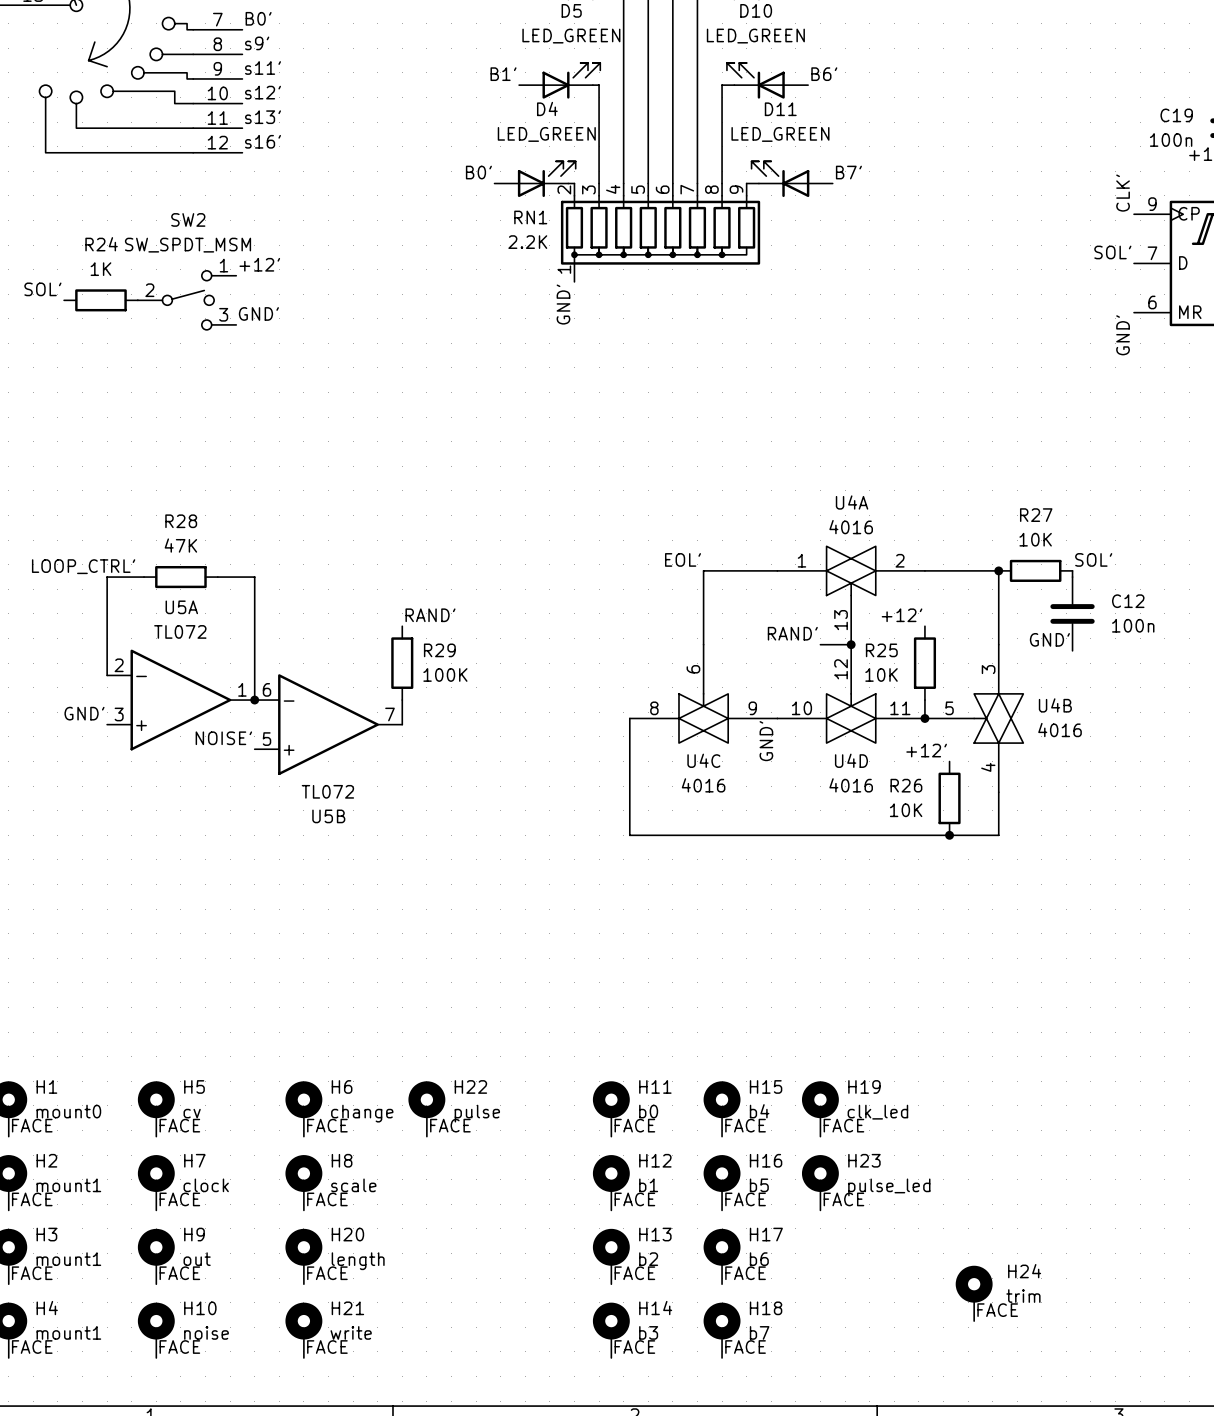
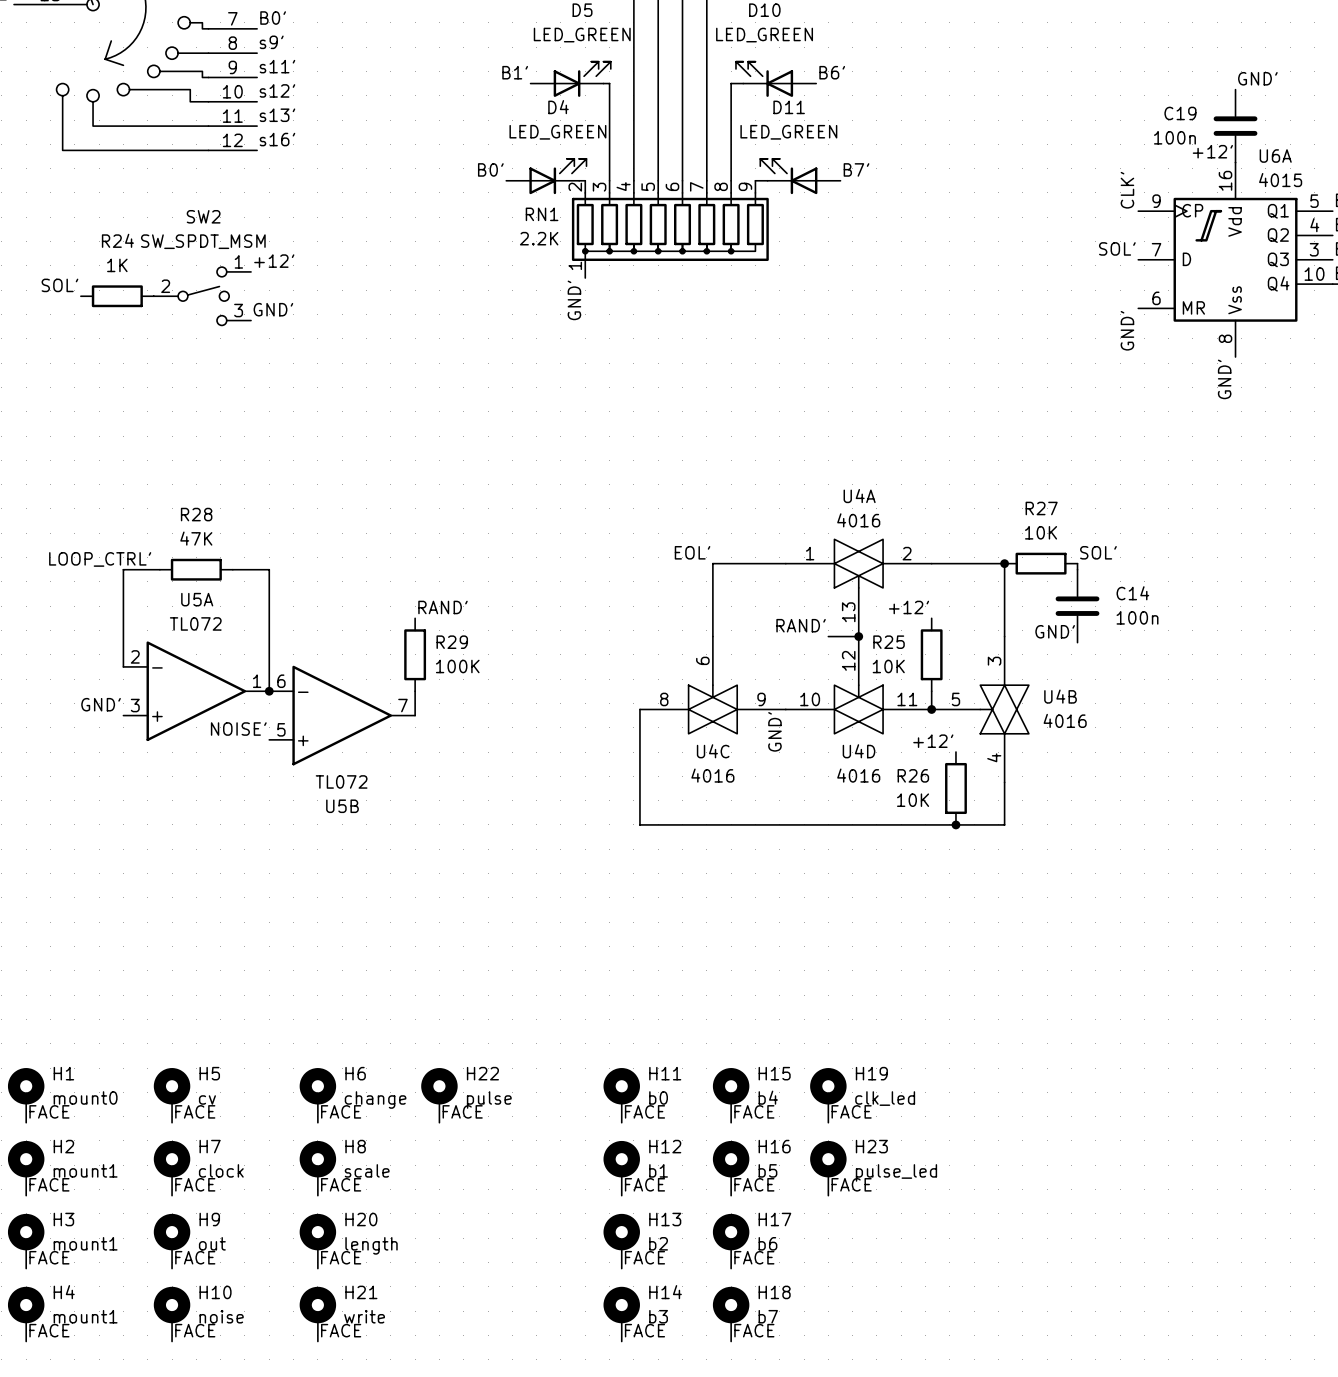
C12 name: C12 (1128, 601) -> C14 (1132, 593)
H24: trim (974, 1293) -> none
label: FACE (997, 1310) -> none

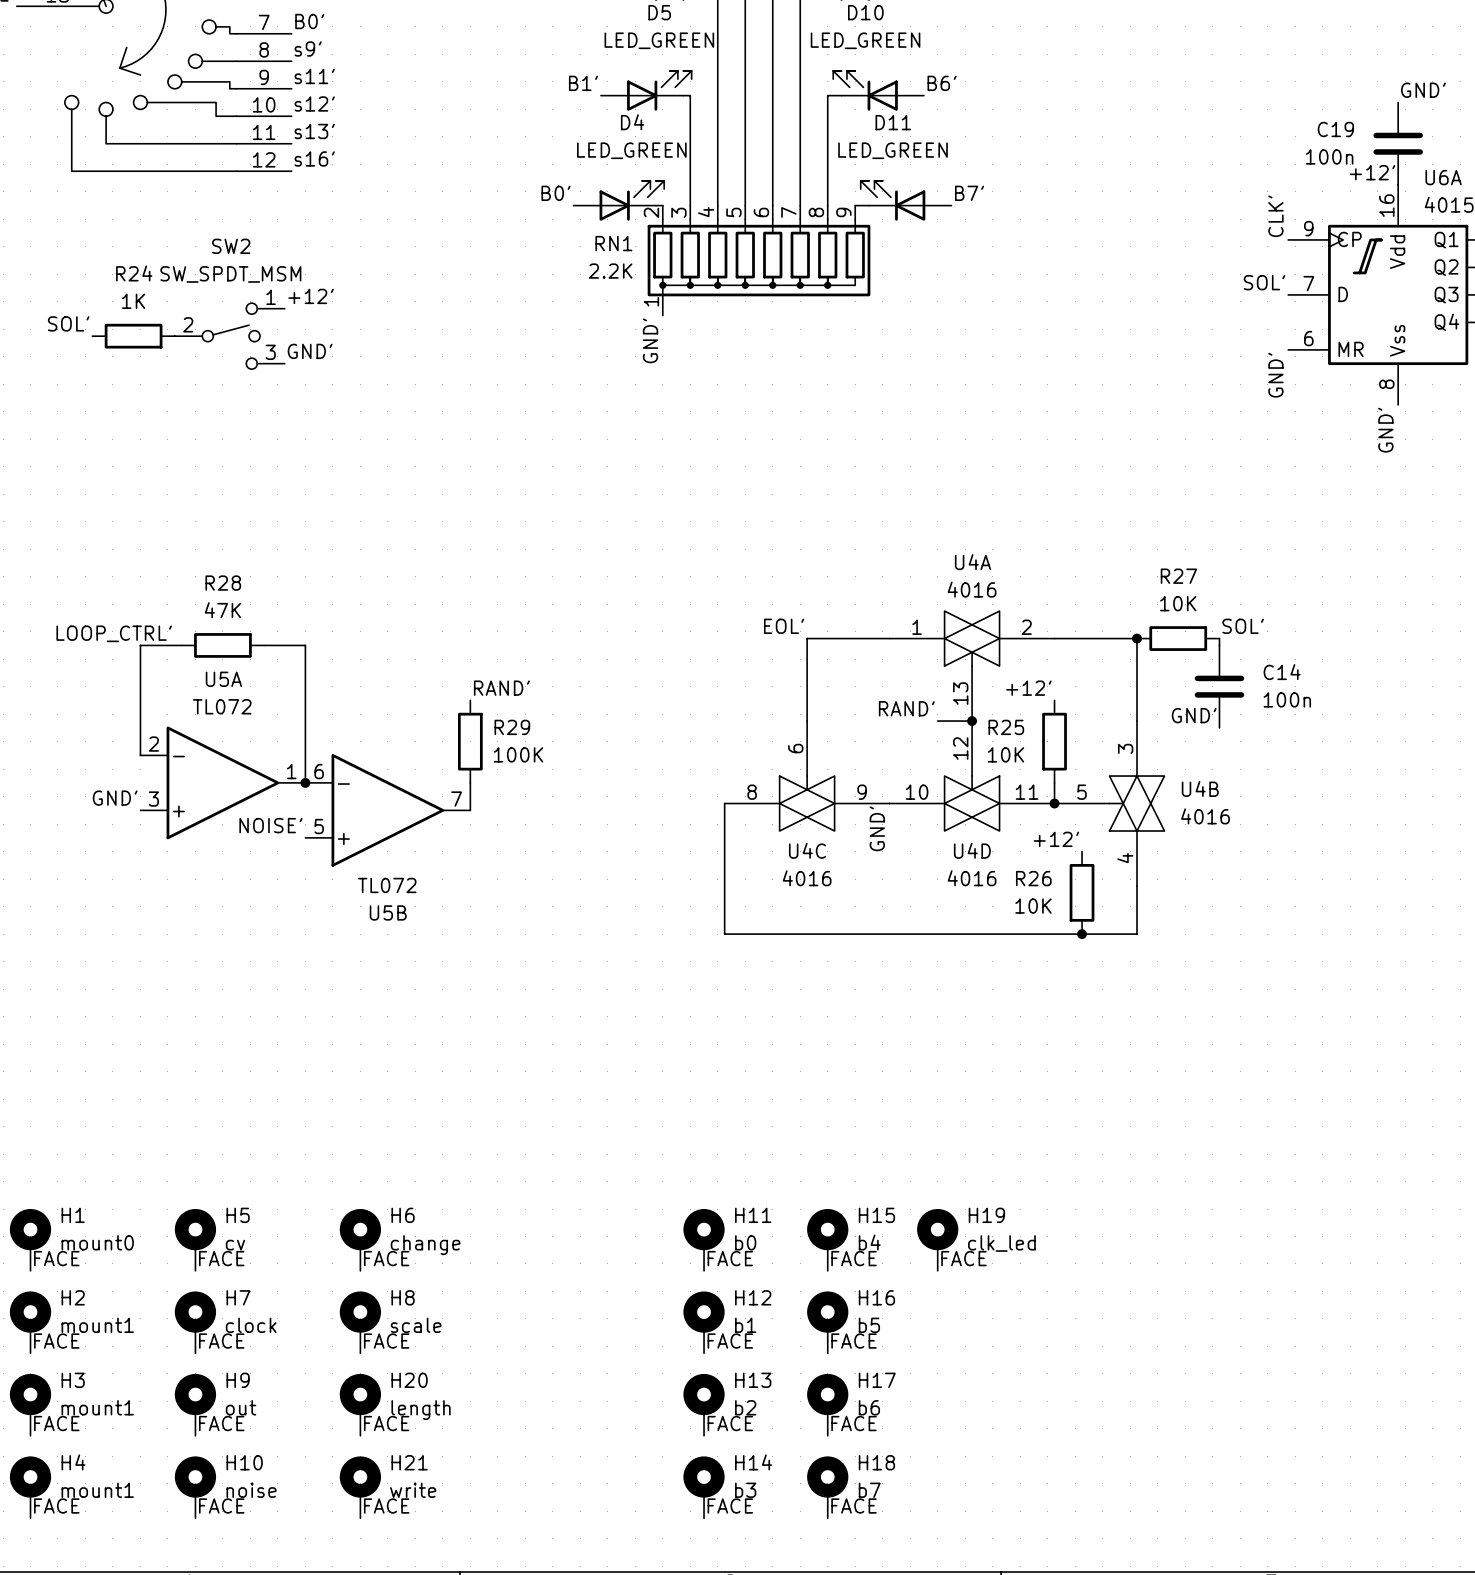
H22: pulse (439, 1095) -> none
label: FACE (462, 1111) -> none
H23: pulse_led (828, 1168) -> none
label: FACE (851, 1184) -> none

